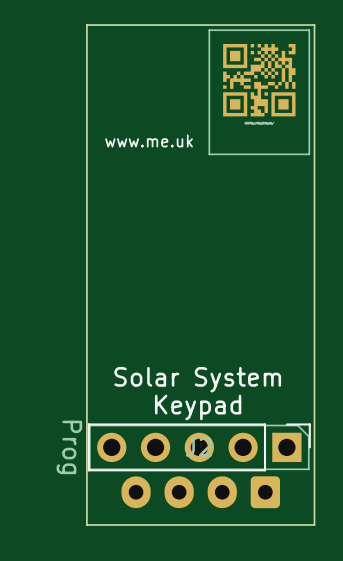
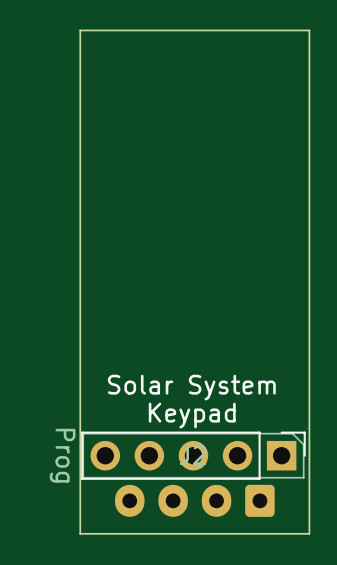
part: (259, 92) -> none
drawing: [105, 134, 193, 148] -> none

